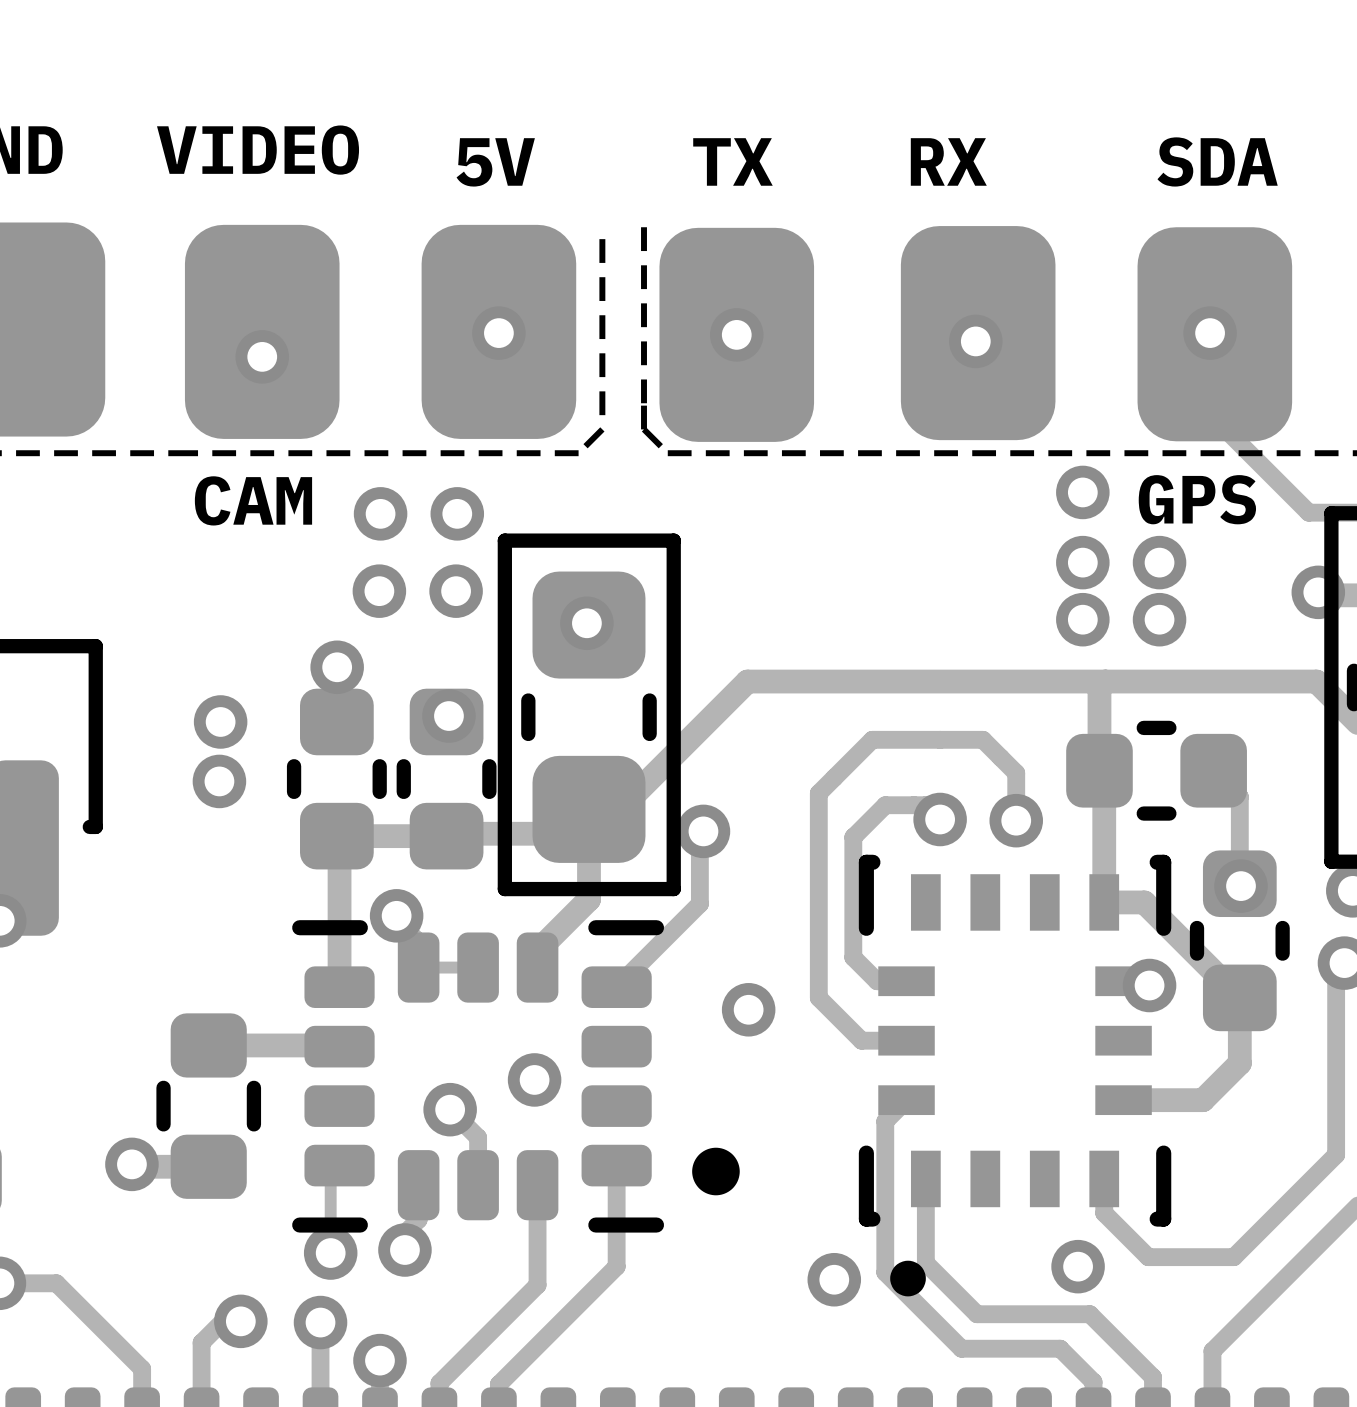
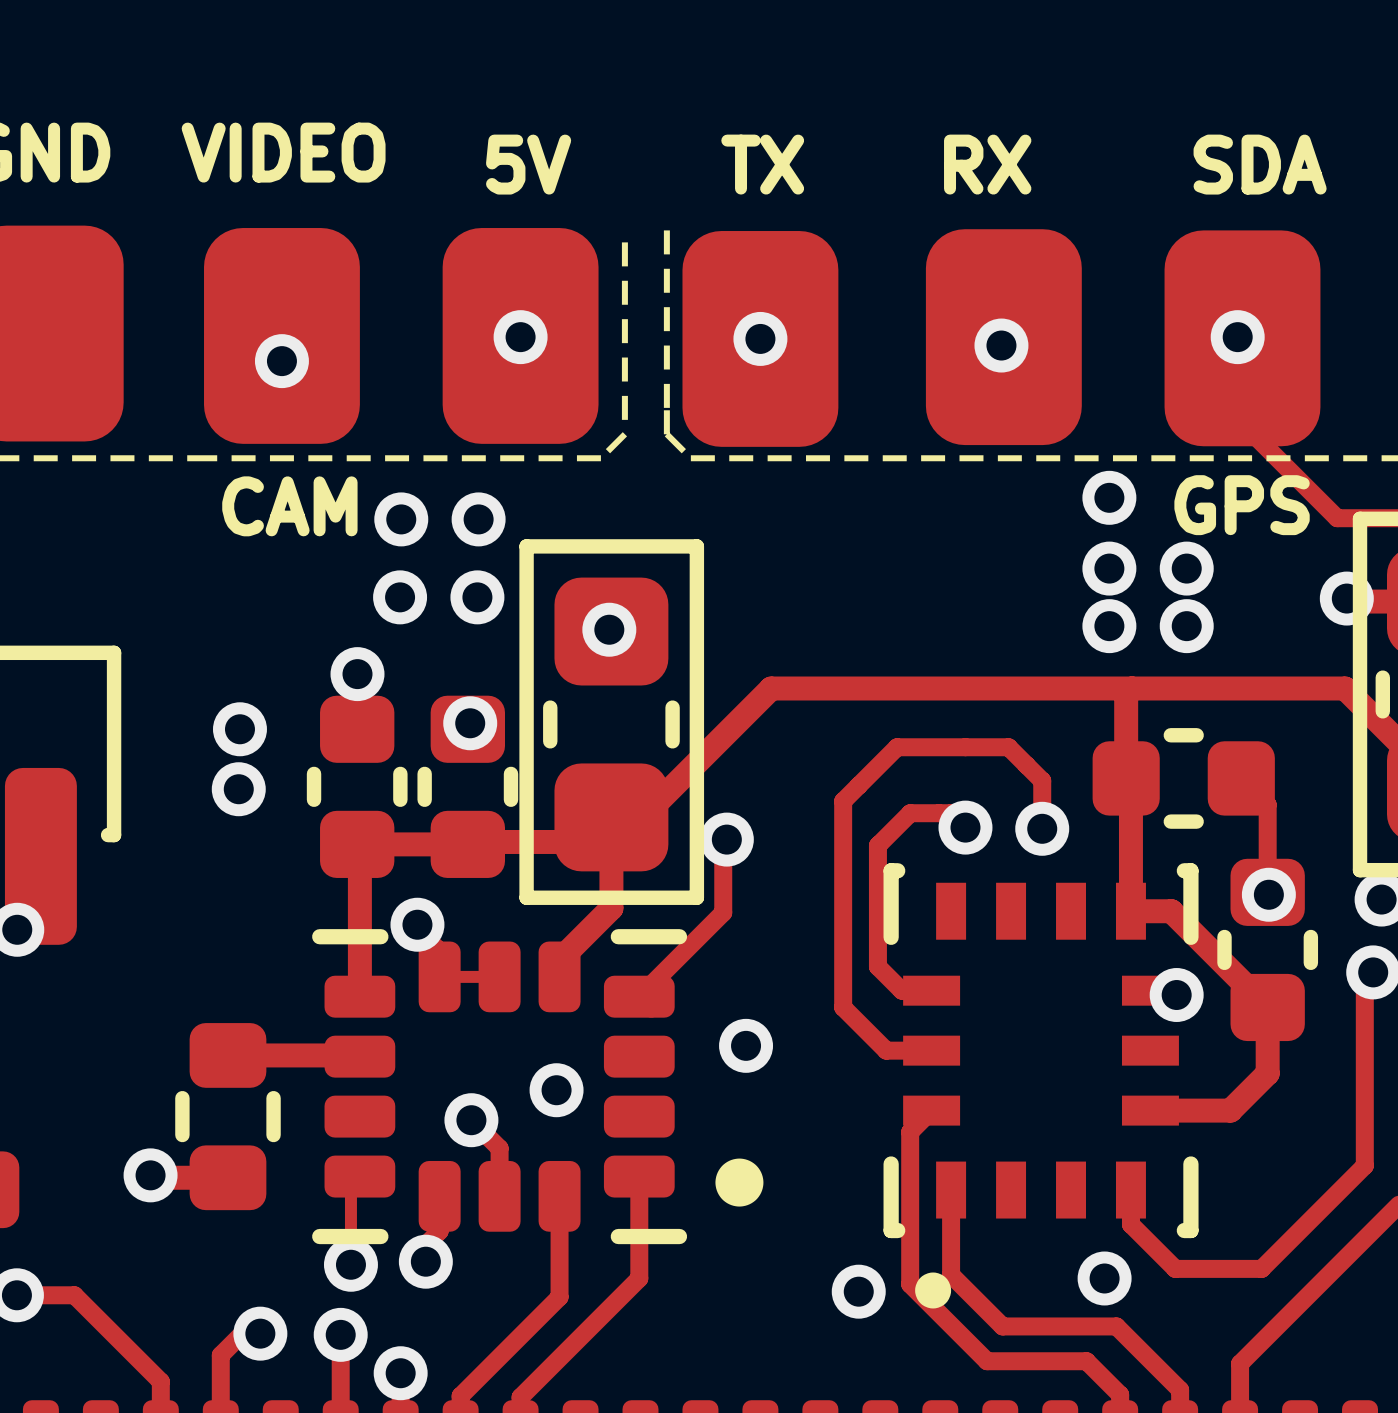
via position: (748, 1009) -> (746, 1045)

